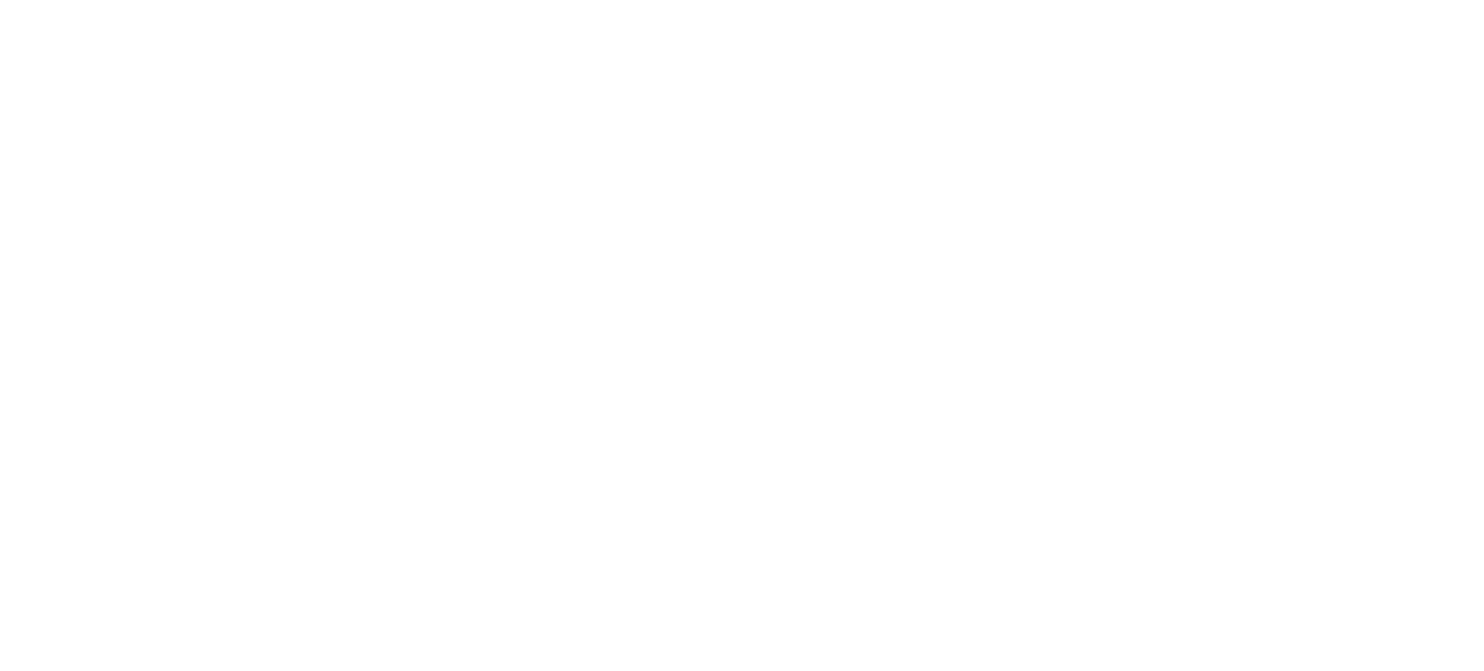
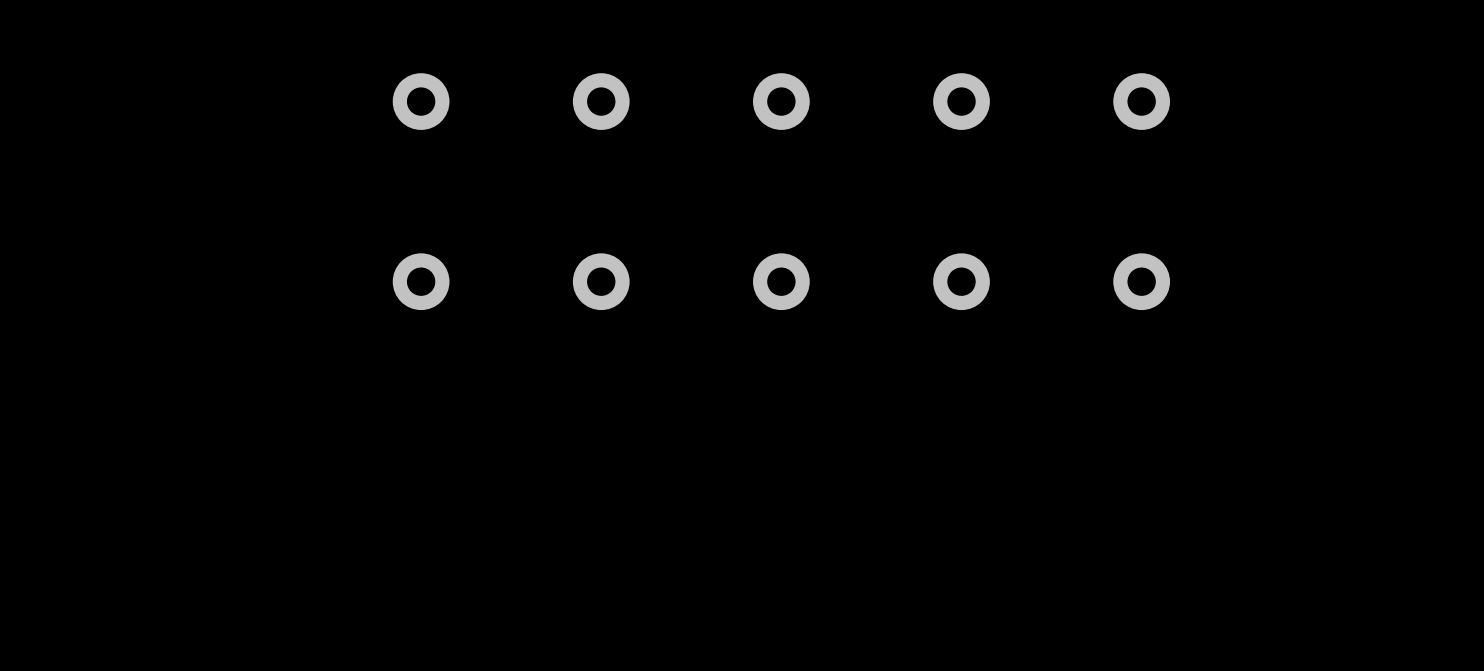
via: none -> (421, 101)
via: none -> (601, 101)
via: none -> (781, 101)
via: none -> (961, 101)
via: none -> (1141, 101)
via: none -> (421, 281)
via: none -> (601, 281)
via: none -> (781, 281)
via: none -> (961, 281)
via: none -> (1141, 281)

